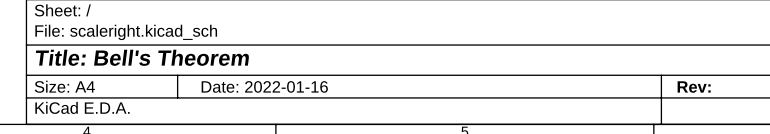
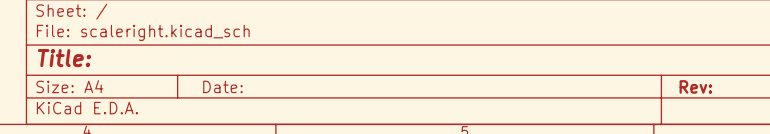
title block: Title: Bell's Theorem (142, 57) -> Title: (64, 58)
title block: Date: 2022-01-16 (264, 86) -> Date: (222, 86)

